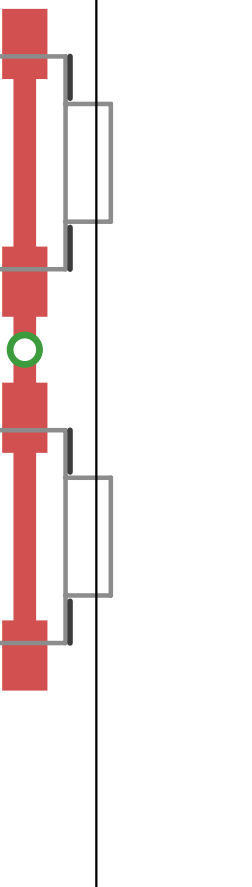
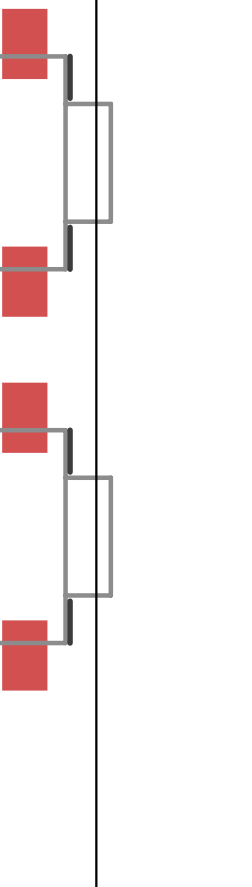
top track: (24, 43) (24, 655) -> none
via: (24, 349) -> none

